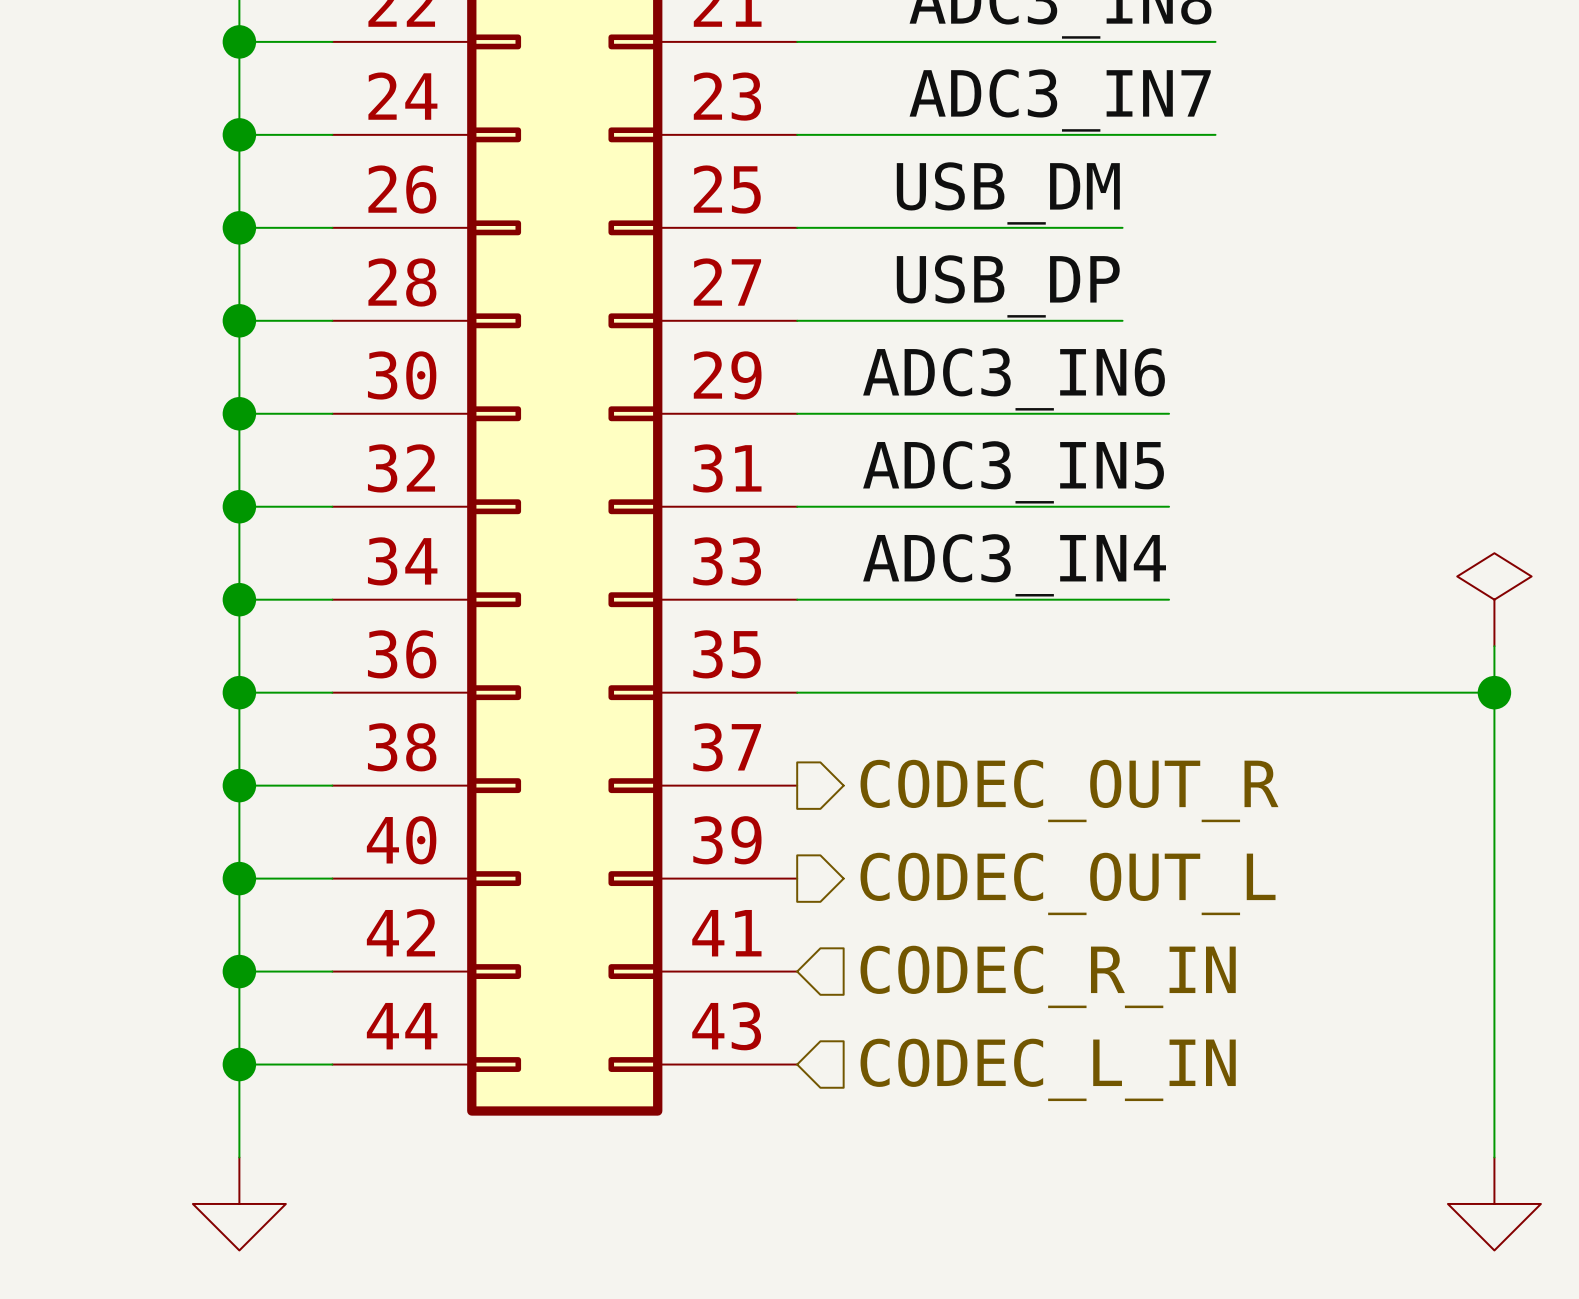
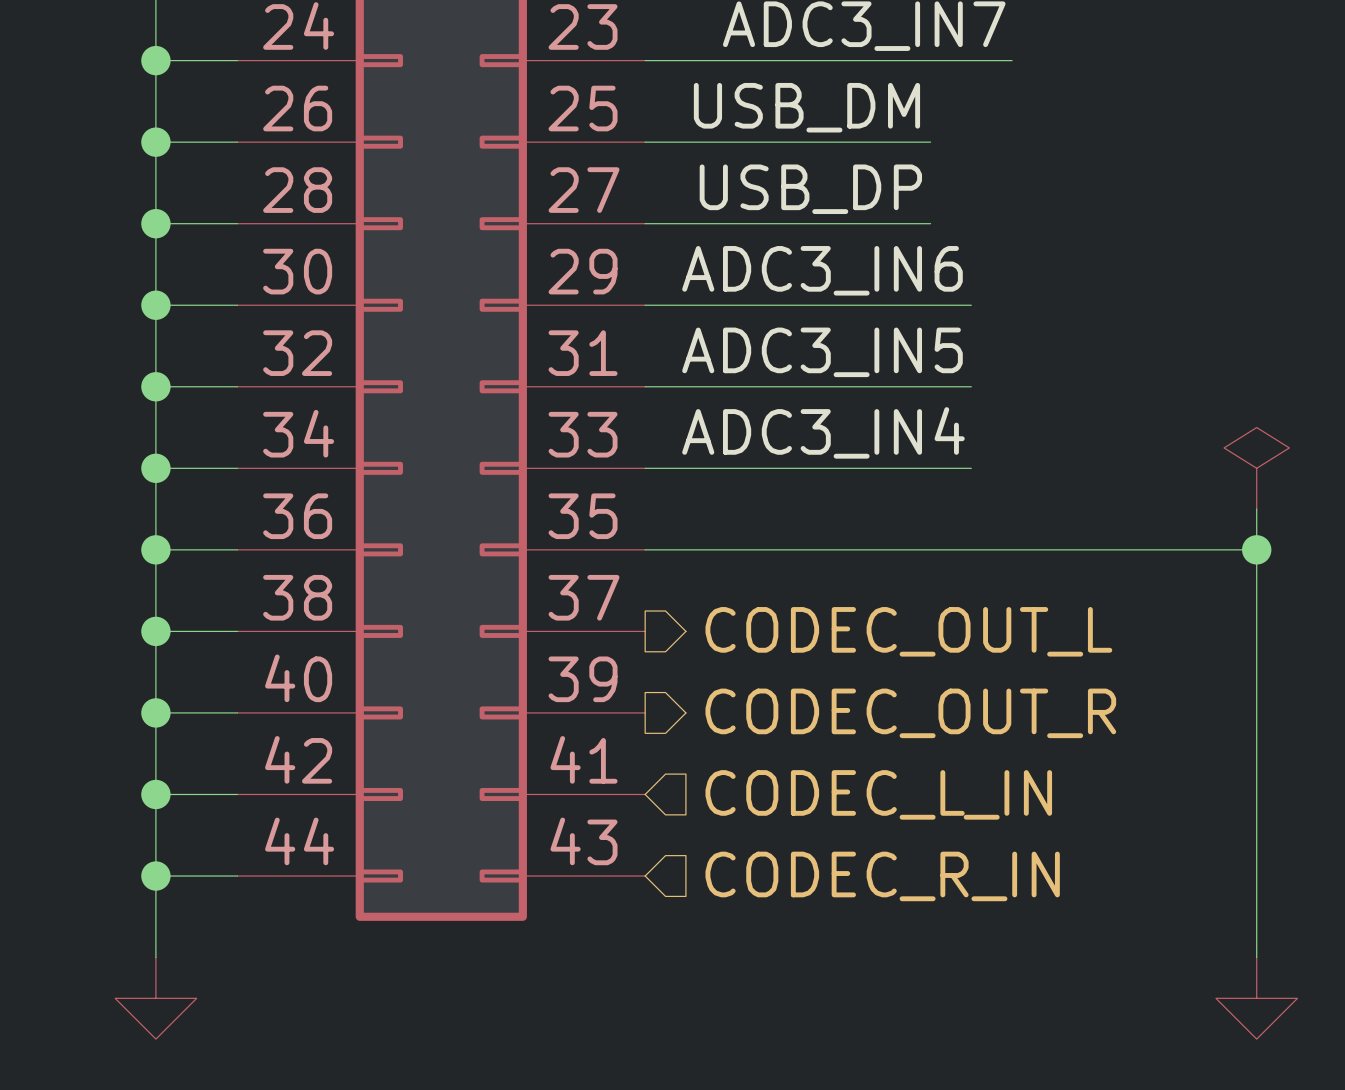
hierarchical label: CODEC_OUT_R (1069, 790) -> CODEC_OUT_L (908, 631)
hierarchical label: CODEC_OUT_L (1068, 883) -> CODEC_OUT_R (910, 713)
hierarchical label: CODEC_R_IN (1048, 976) -> CODEC_L_IN (878, 794)
hierarchical label: CODEC_L_IN (1048, 1069) -> CODEC_R_IN (882, 876)

